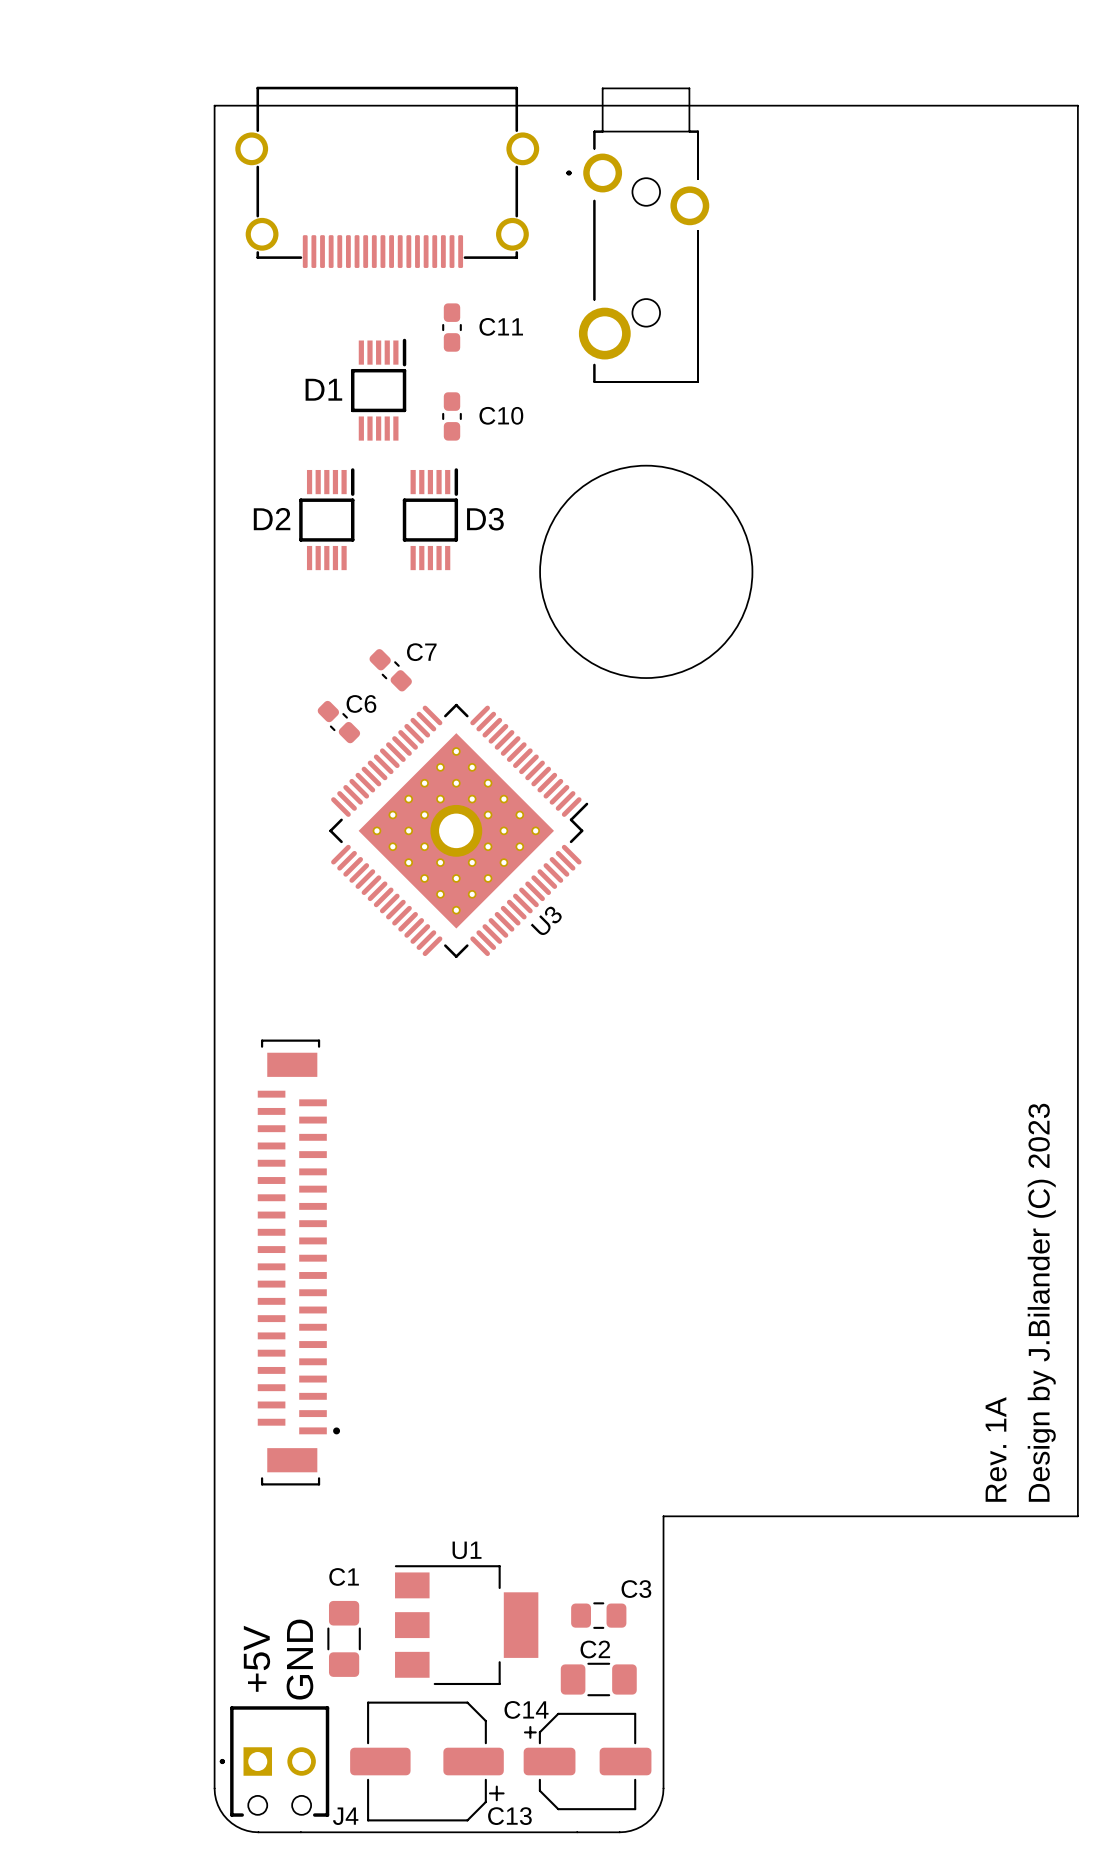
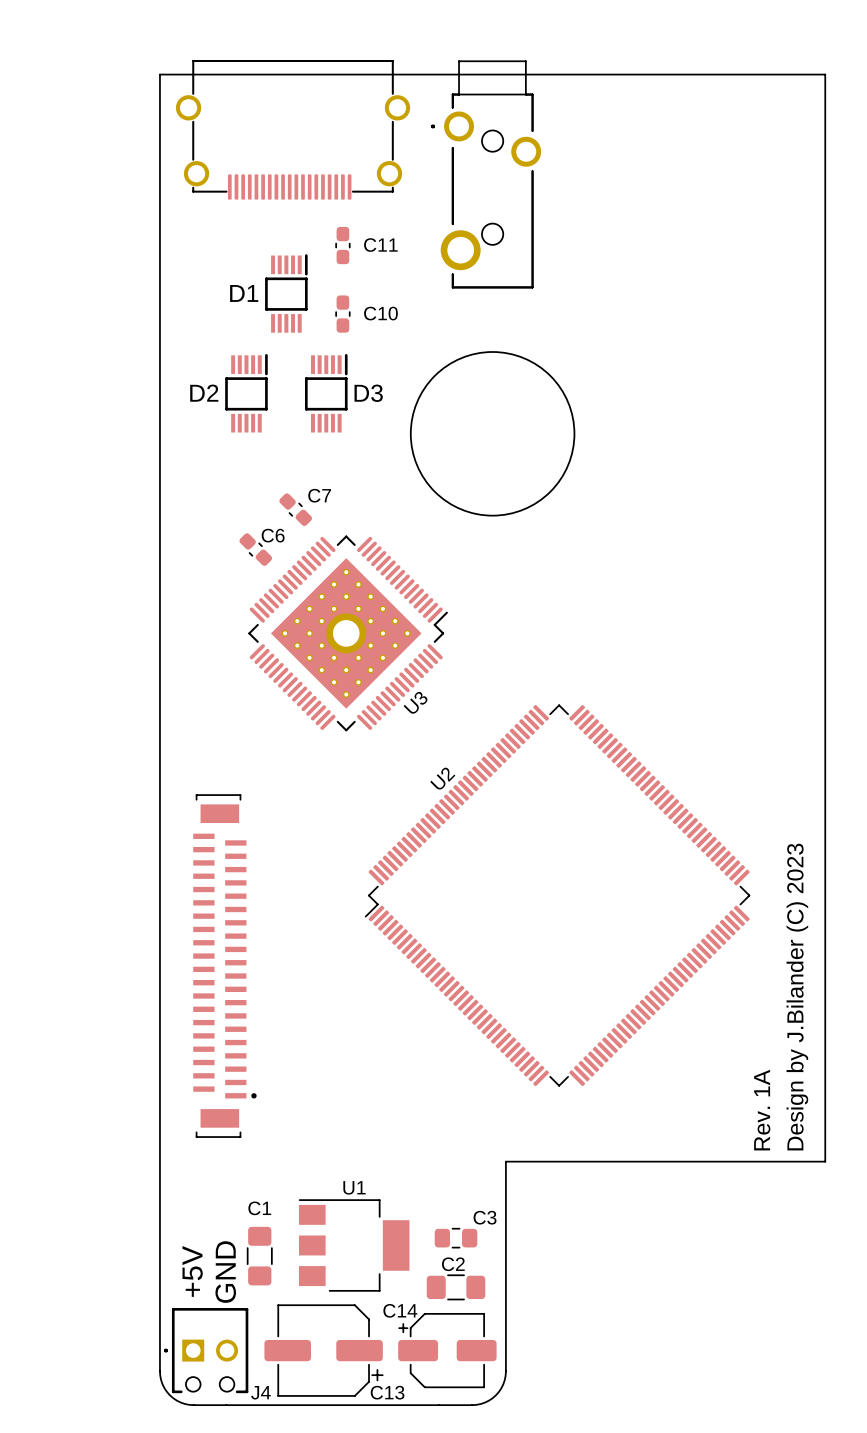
U2: none -> (557, 895)

